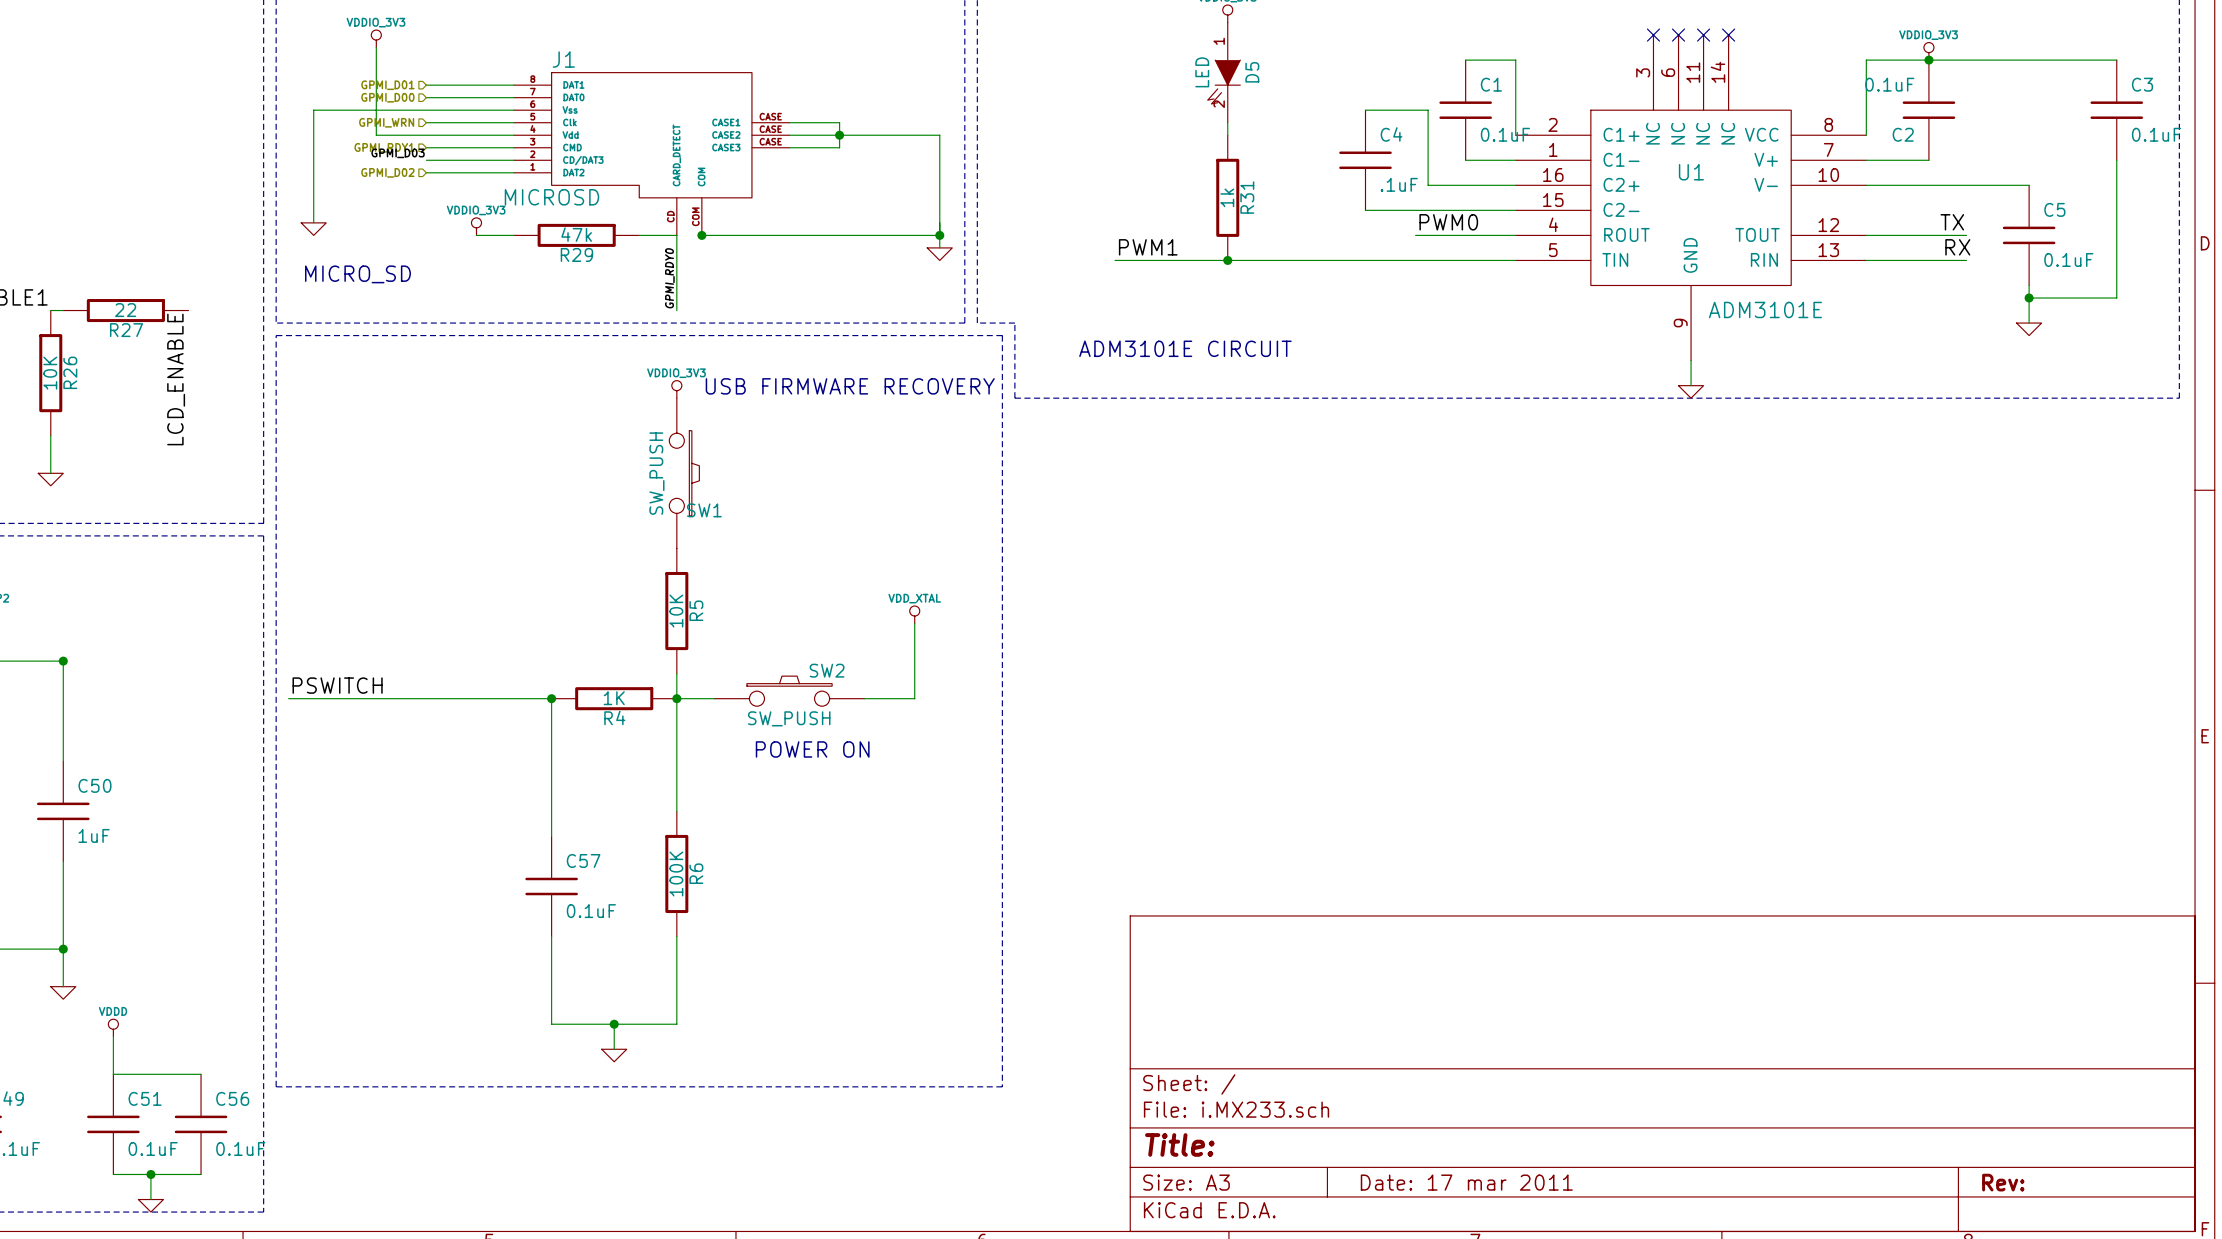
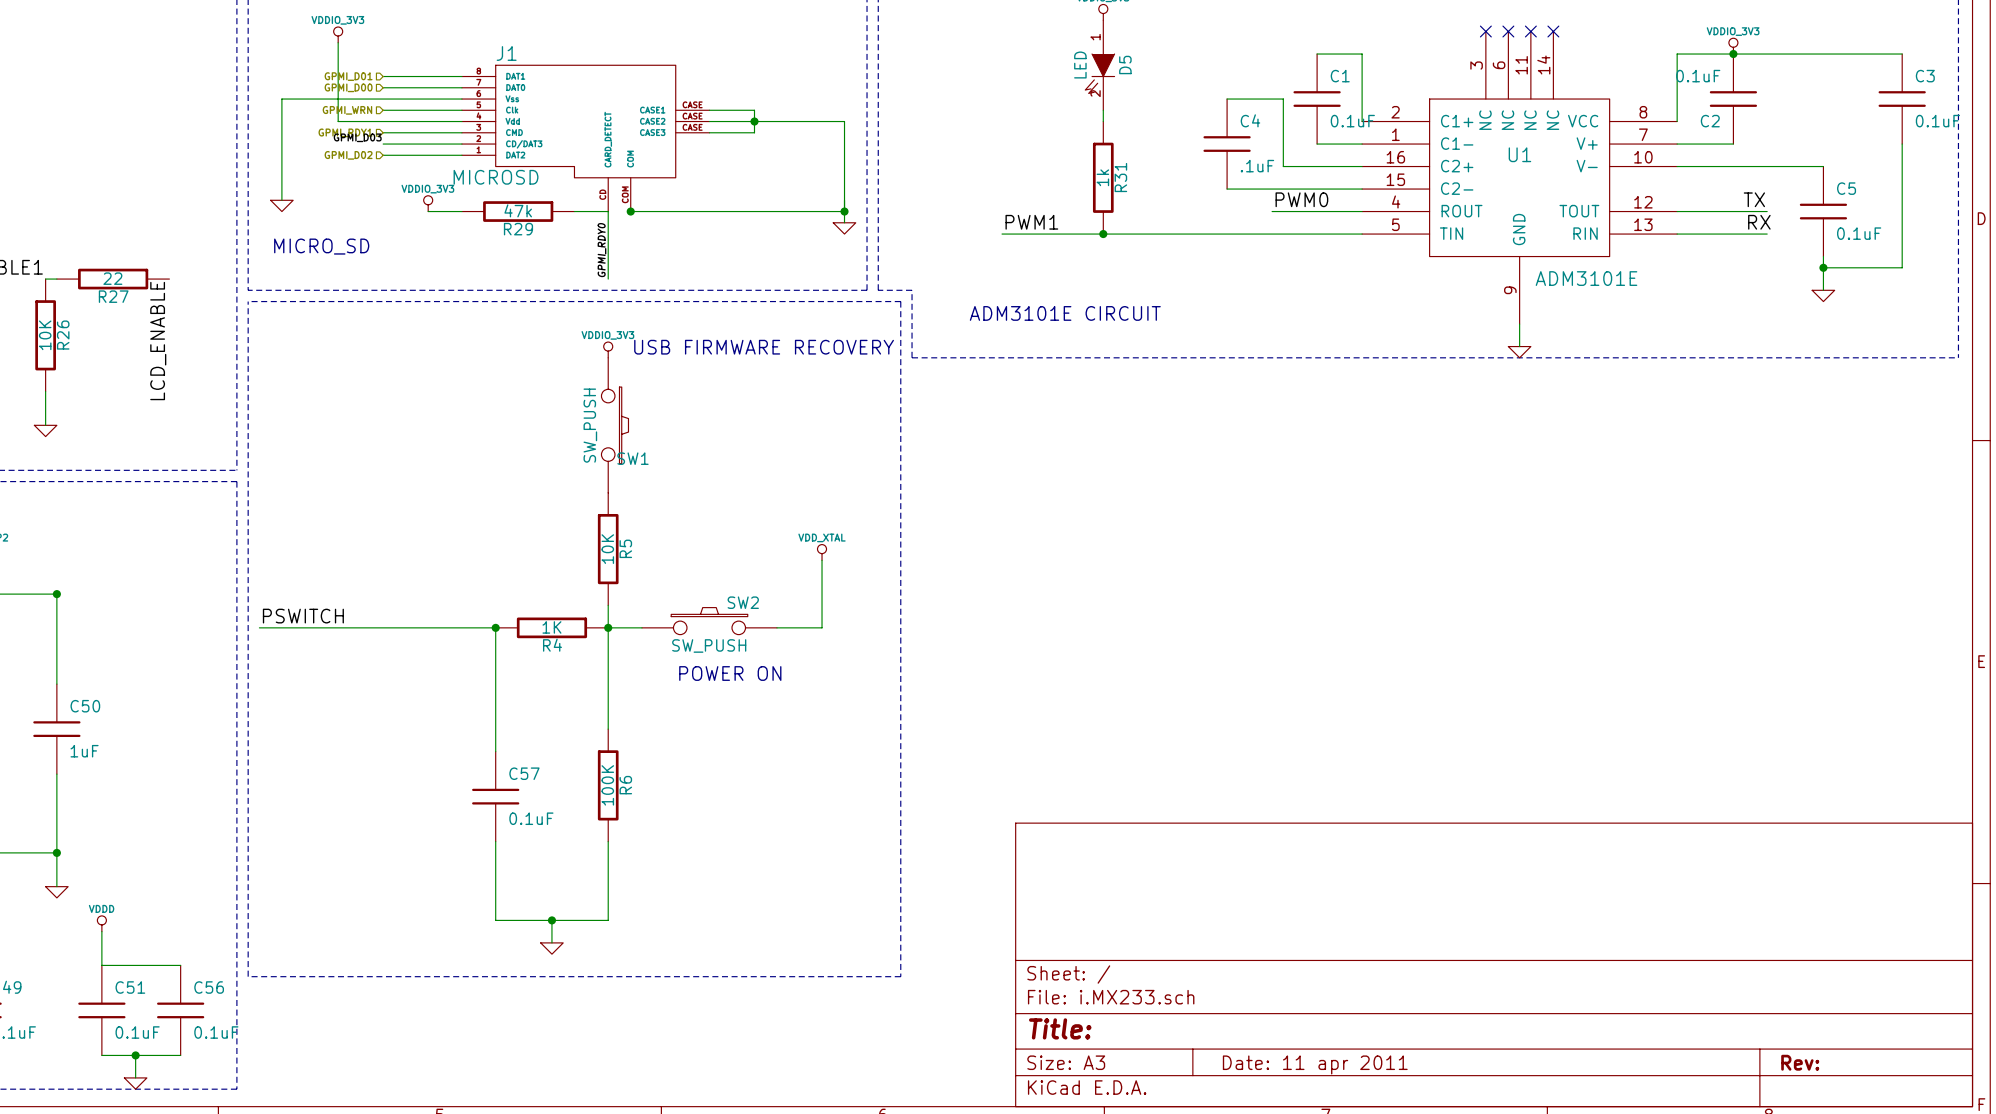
title block: Date: 17 mar 2011 (1466, 1182) -> Date: 11 apr 2011 (1315, 1064)

